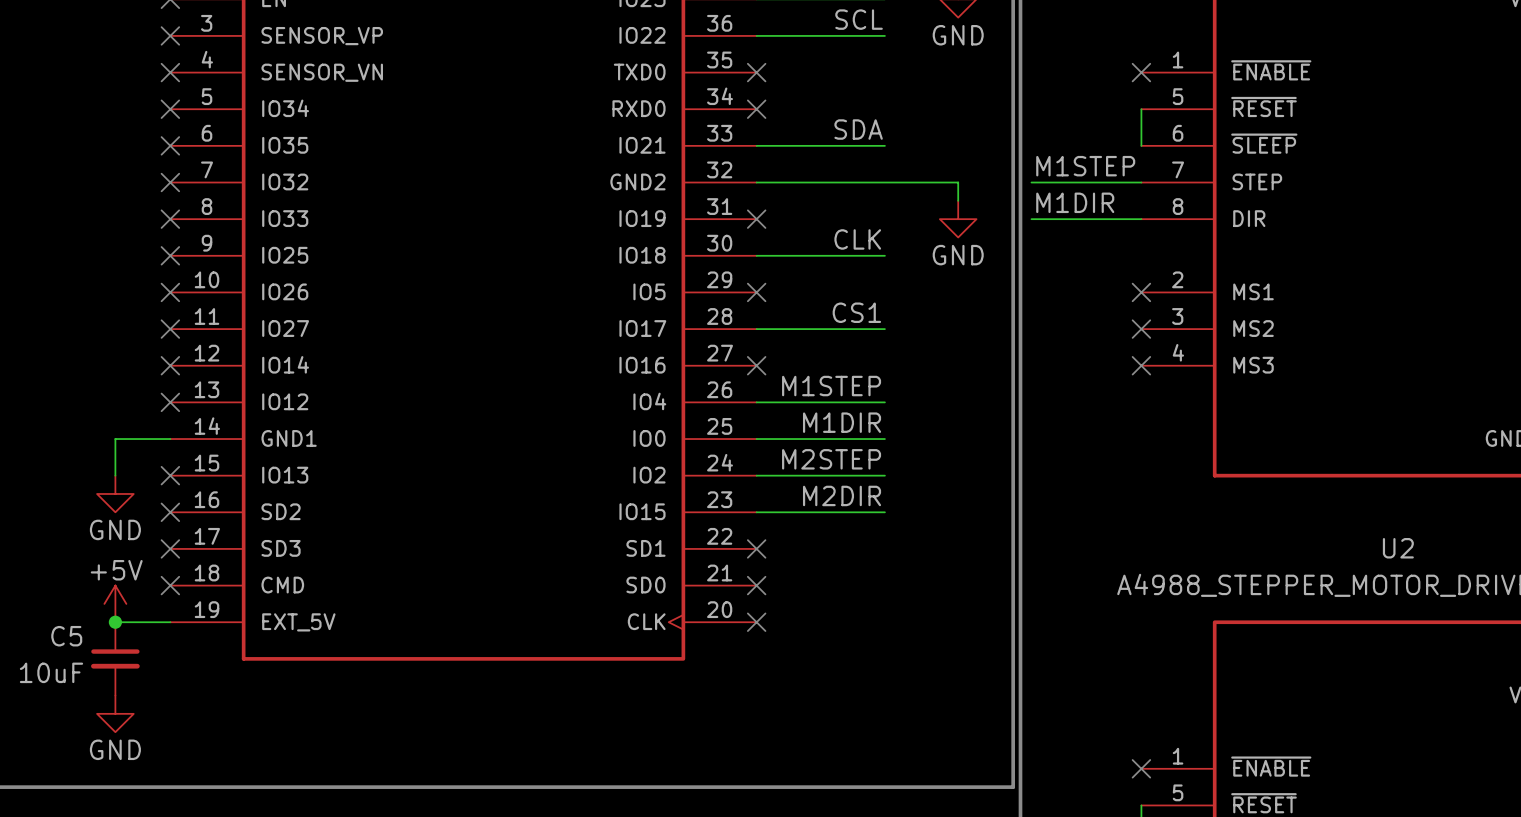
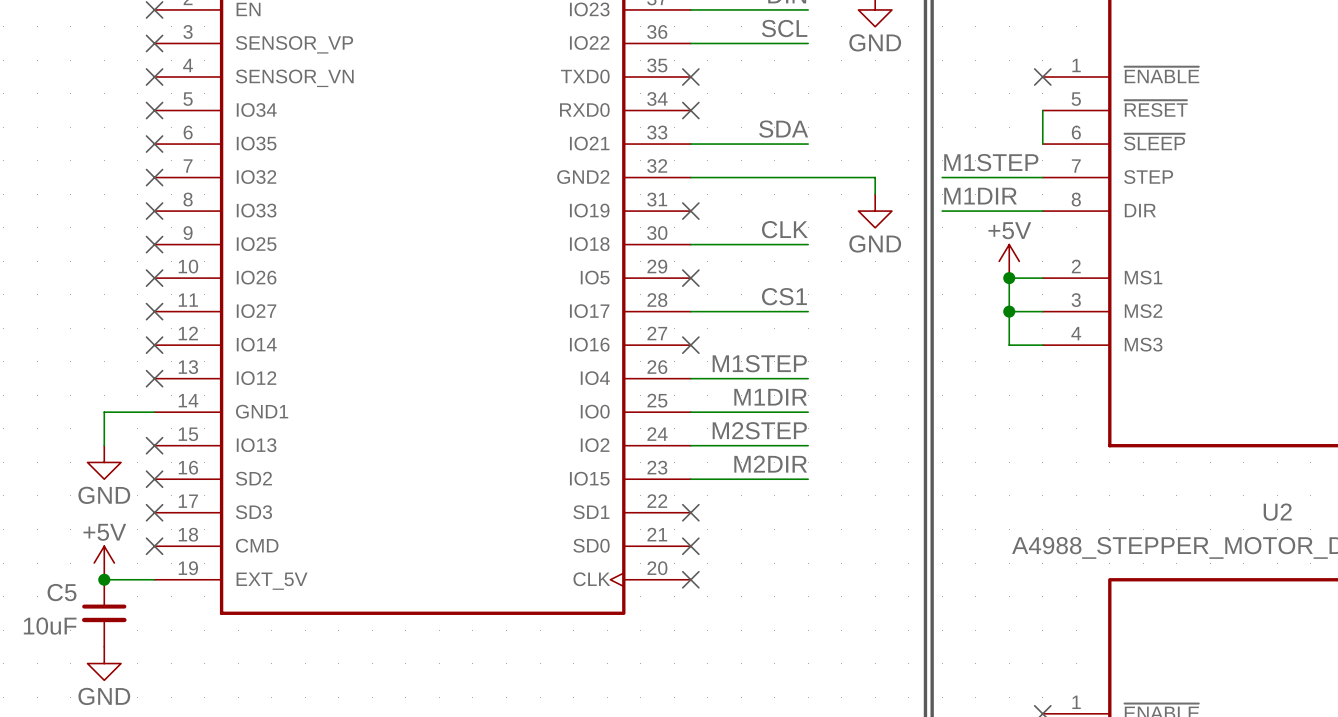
power symbol: none -> +5V (1009, 261)
junction: none -> (1009, 278)
wire: none -> (1042, 278) (1009, 278) (1009, 345) (1042, 345)
no-connect mark: (1141, 292) -> none
wire: none -> (1009, 311) (1042, 311)
junction: none -> (1009, 311)
no-connect mark: (1141, 329) -> none
no-connect mark: (1141, 365) -> none

